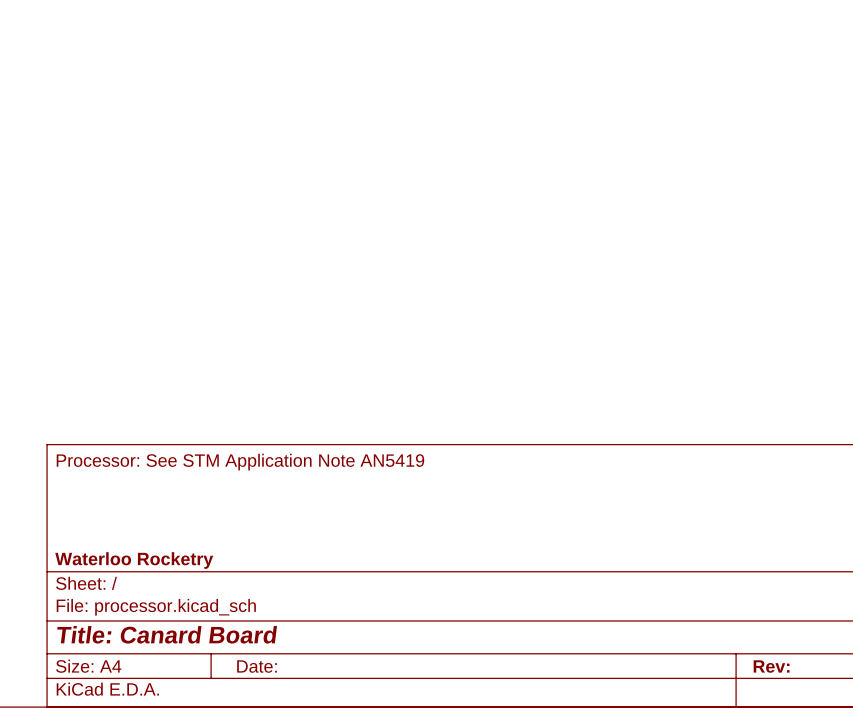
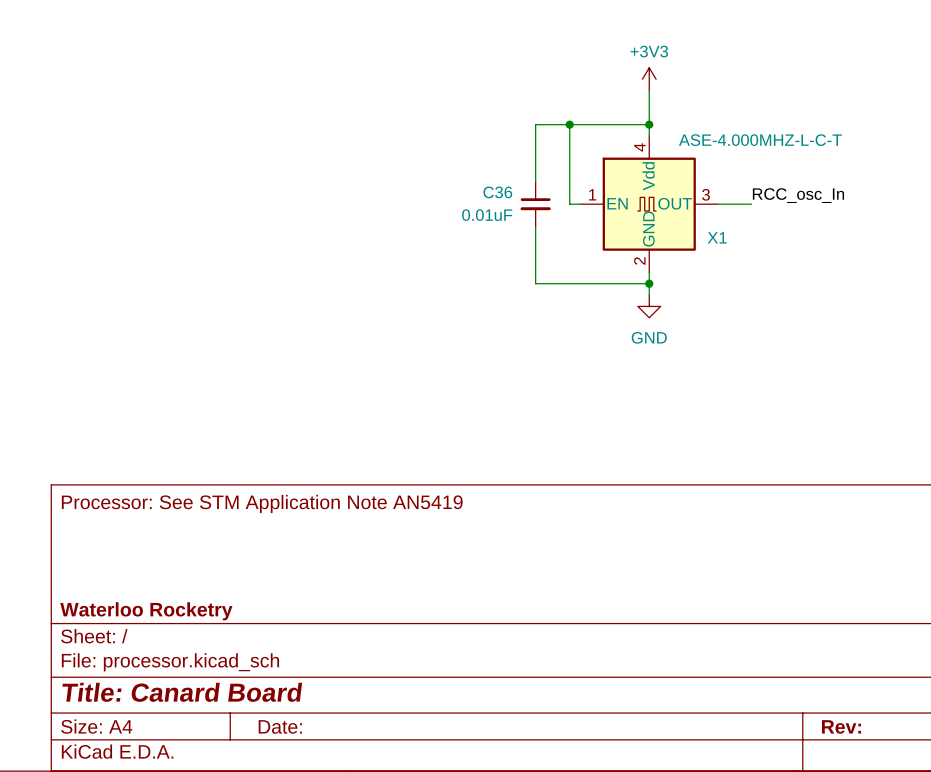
power symbol: none -> +3V3 (649, 79)
wire: none -> (649, 90) (649, 136)
wire: none -> (569, 124) (569, 204) (581, 204)
junction: none -> (569, 124)
wire: none -> (649, 124) (535, 124) (535, 181)
junction: none -> (649, 124)
label: none -> RCC_osc_In (798, 195)
C36: none -> 0.01uF (535, 204)
X1: none -> ASE-4.000MHZ-L-C-T (649, 204)
wire: none -> (717, 204) (751, 204)
wire: none -> (535, 226) (535, 283) (649, 283)
wire: none -> (649, 272) (649, 295)
junction: none -> (649, 283)
power symbol: none -> GND (649, 306)

